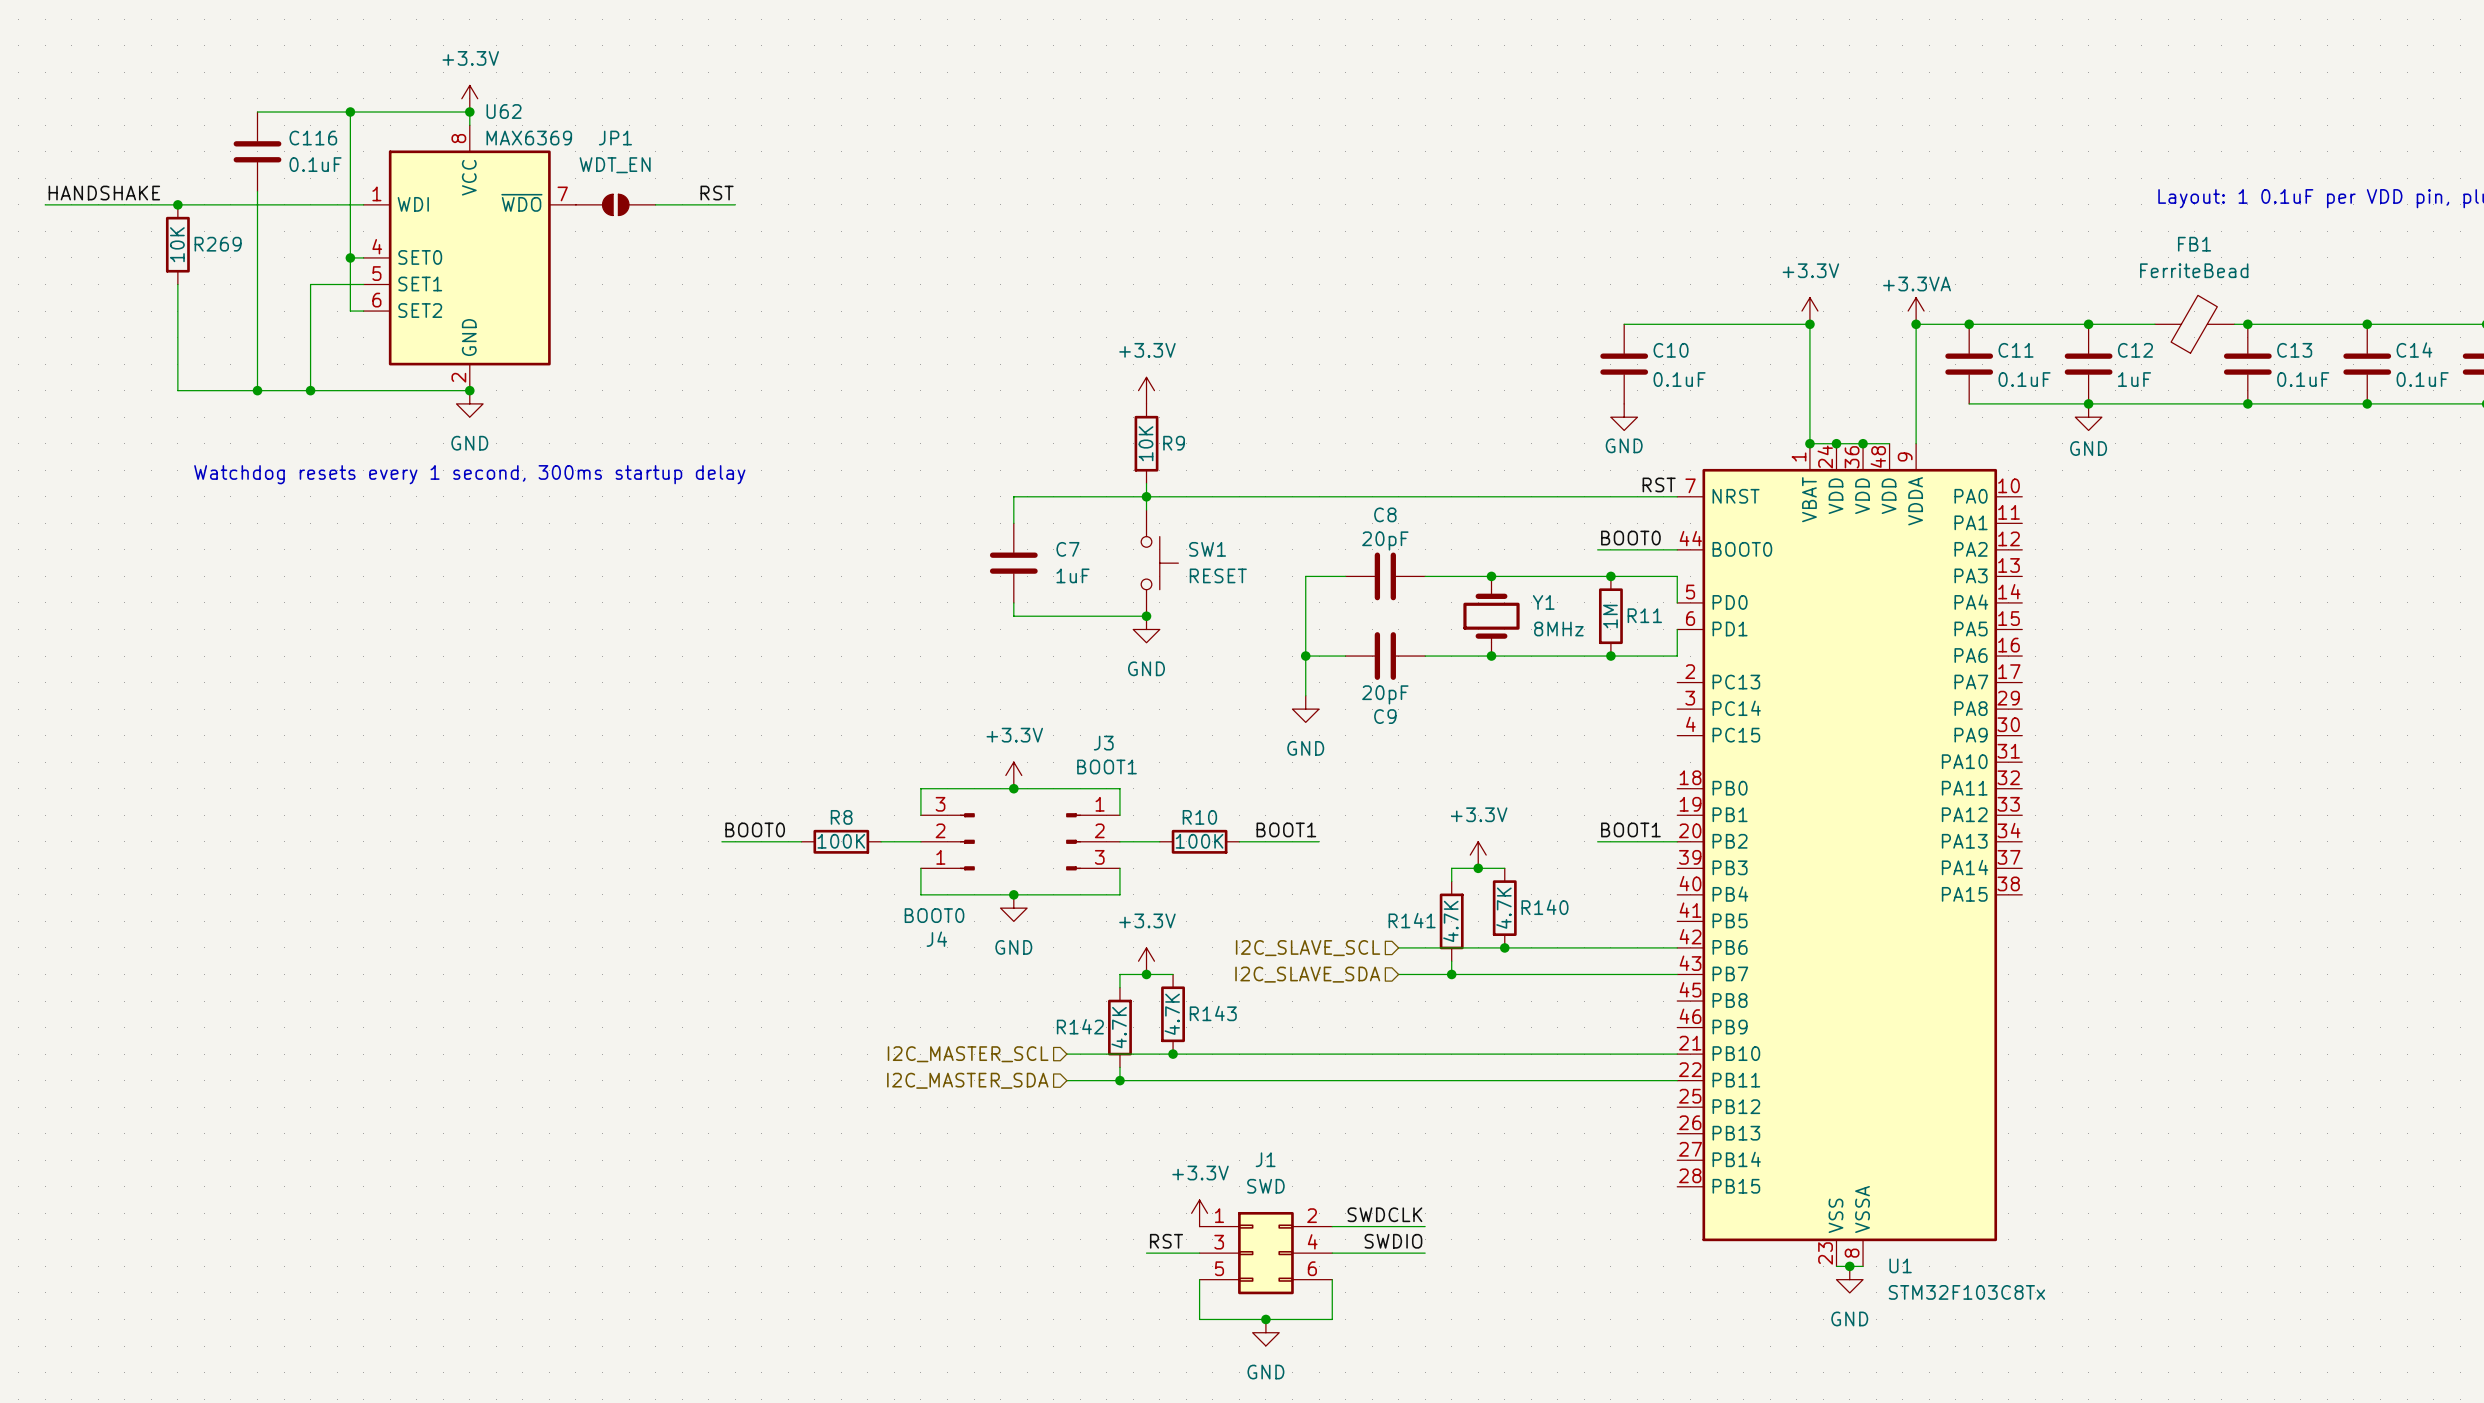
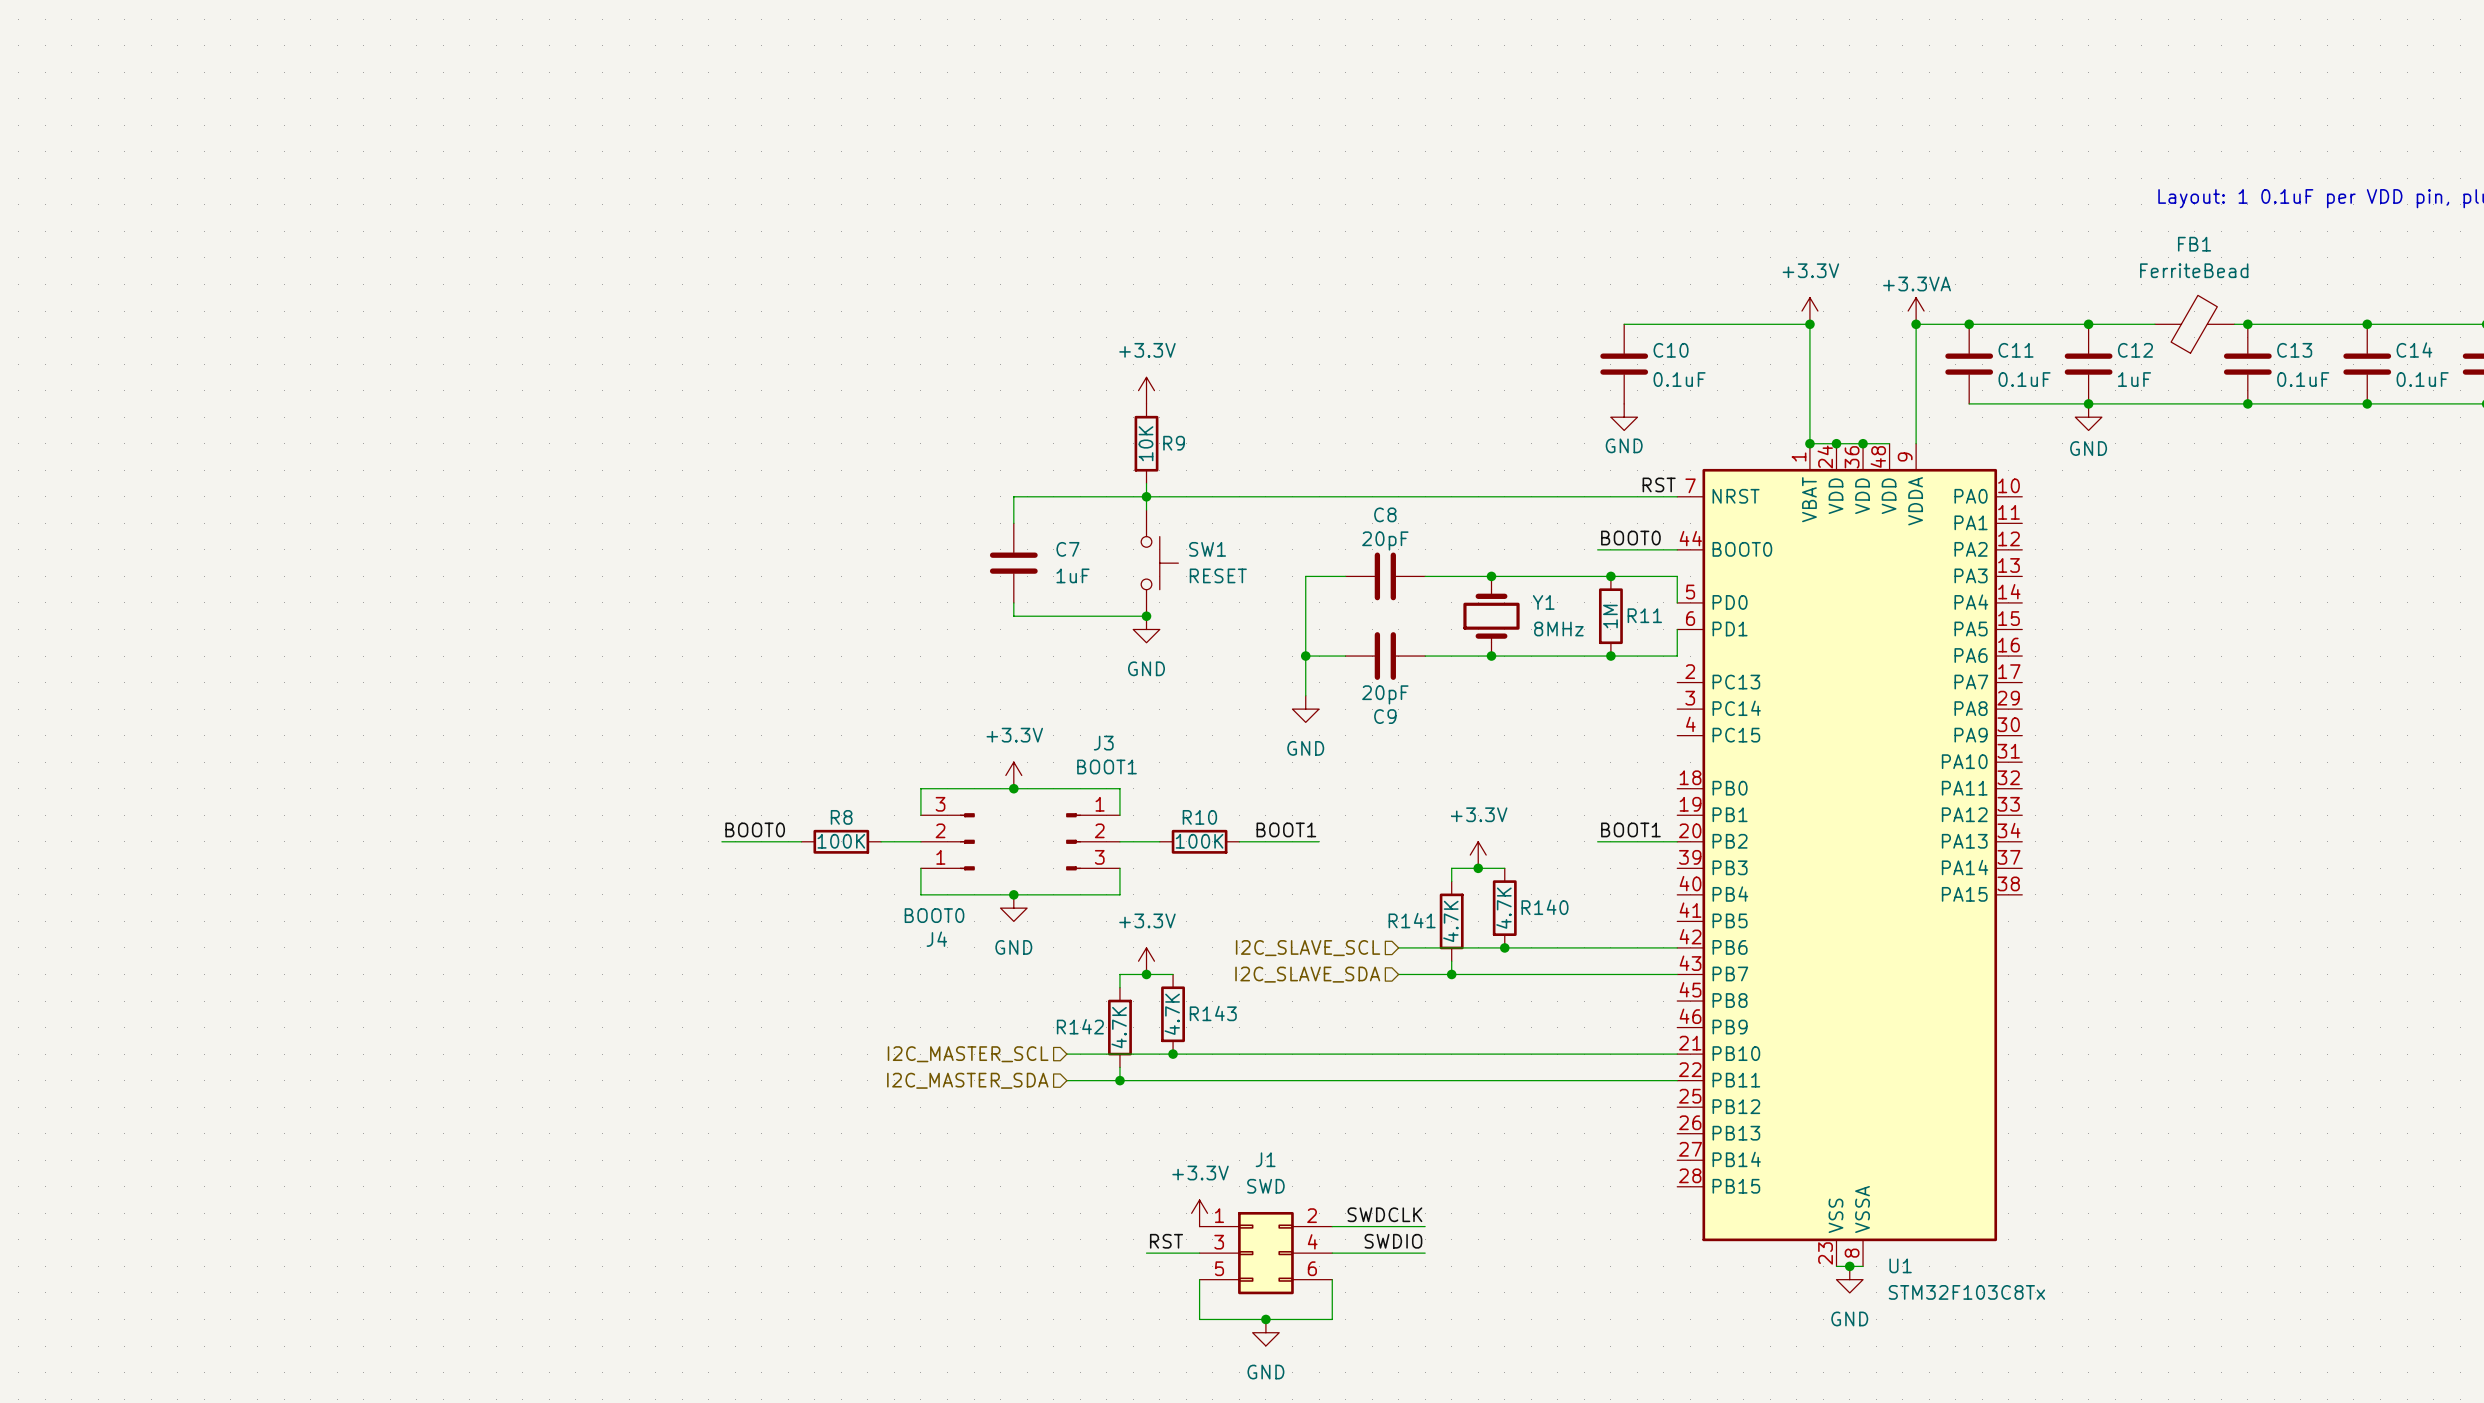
power symbol: +3.3V (469, 98) -> none
wire: (257, 112) (469, 112) (469, 125) -> none
wire: (350, 112) (350, 311) (363, 311) -> none
junction: (350, 112) -> none
junction: (469, 112) -> none
C116: 0.1uF (257, 151) -> none
wire: (257, 191) (257, 390) -> none
label: HANDSHAKE (104, 193) -> none
label: RST (717, 193) -> none
wire: (45, 204) (363, 204) -> none
junction: (177, 204) -> none
JP1: WDT_EN (615, 204) -> none
wire: (655, 204) (735, 204) -> none
R269: 10K (177, 244) -> none
wire: (350, 257) (363, 257) -> none
junction: (350, 257) -> none
U62: MAX6369 (469, 257) -> none
wire: (177, 284) (177, 390) (469, 390) -> none
wire: (363, 284) (310, 284) (310, 390) -> none
junction: (257, 390) -> none
junction: (310, 390) -> none
junction: (469, 390) -> none
power symbol: GND (469, 403) -> none
text: Watchdog resets every 1 second, 300ms startup delay (469, 474) -> none

